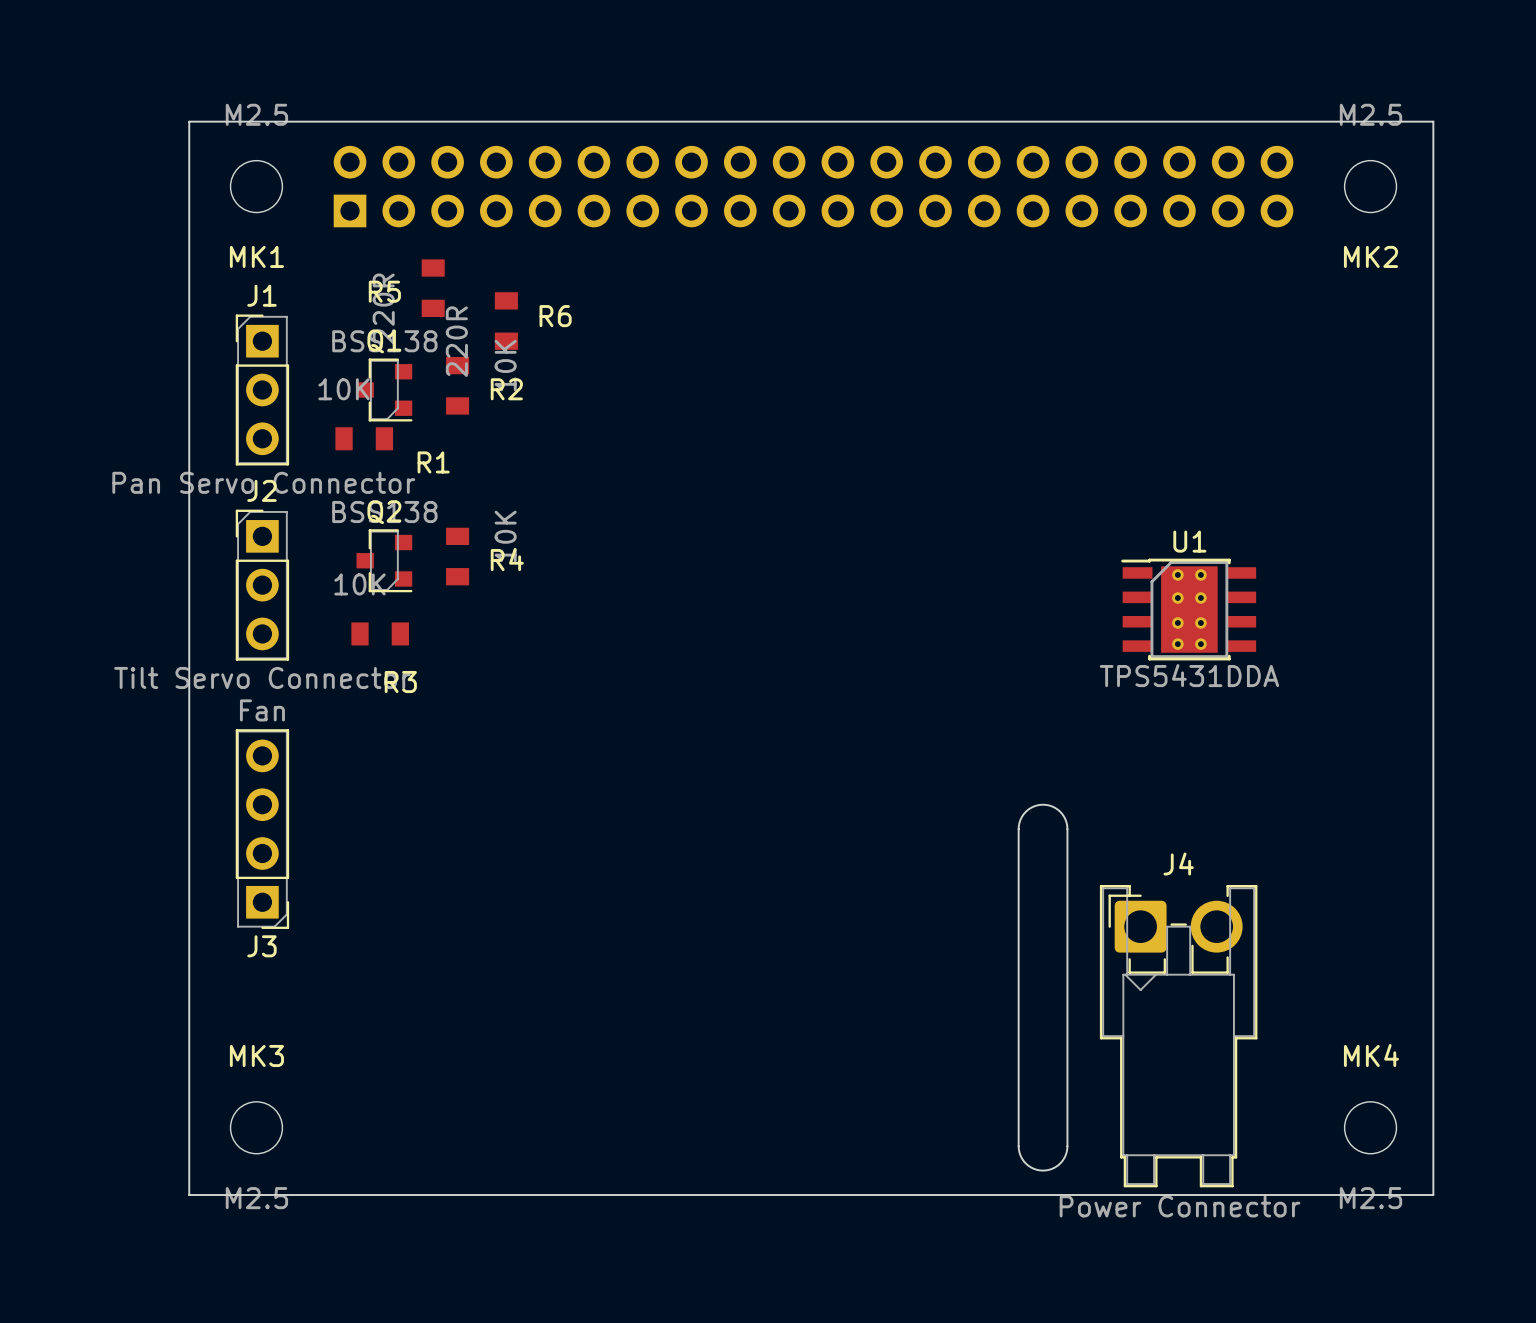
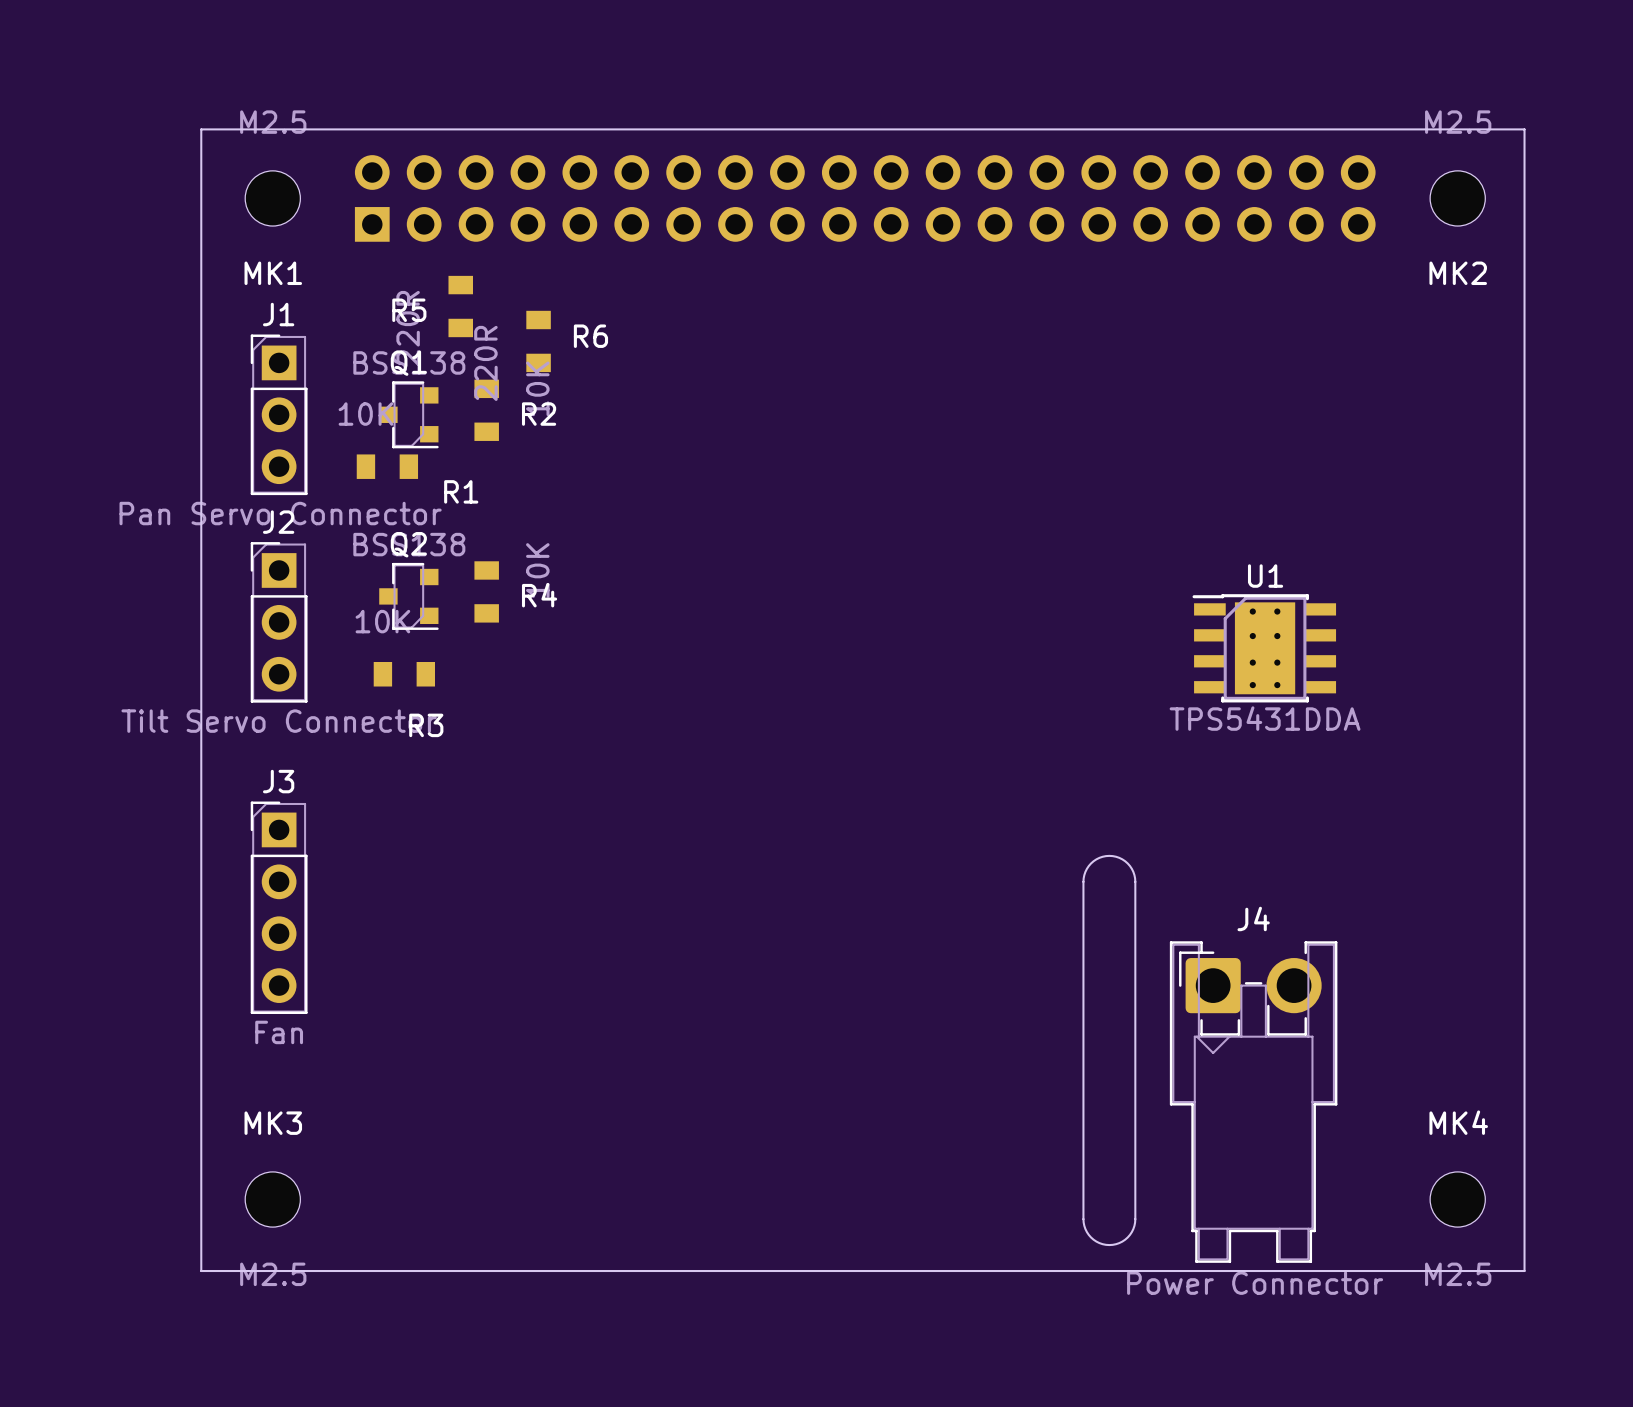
J3 rotation: 0° (262, 829) -> 180° (279, 907)

